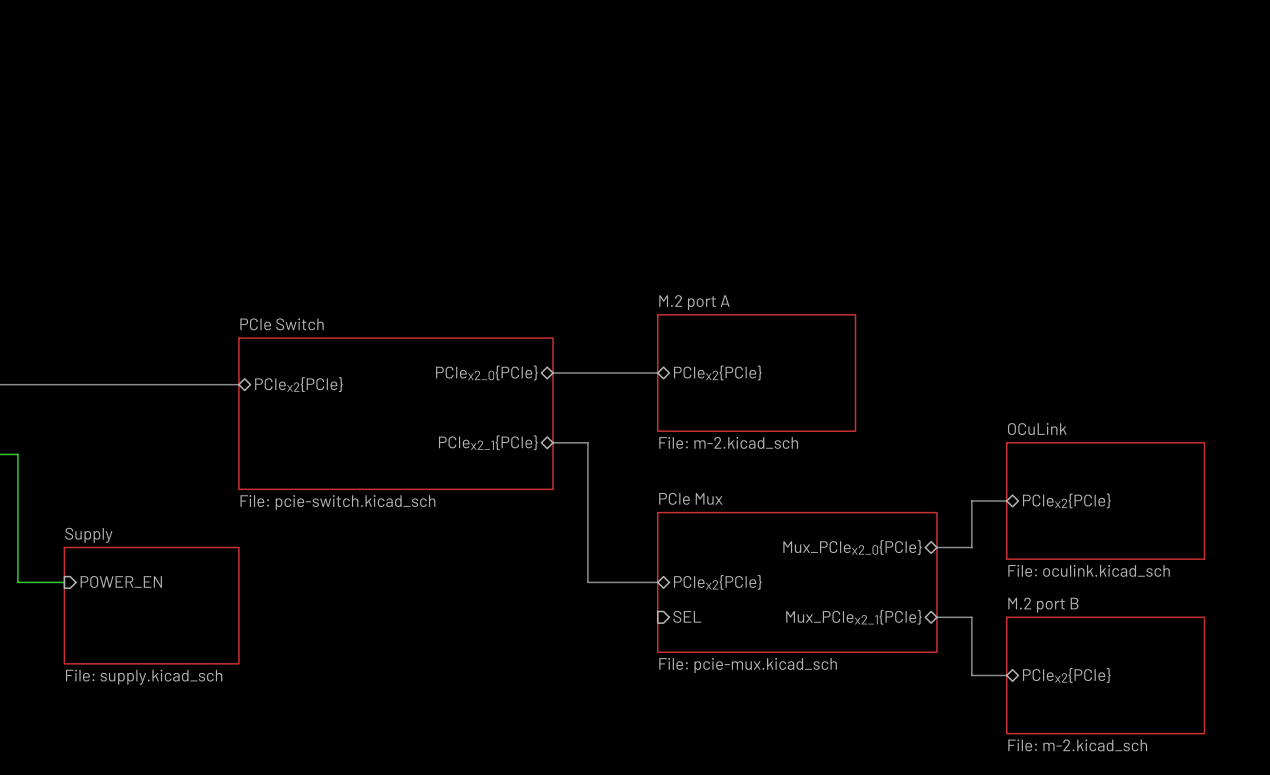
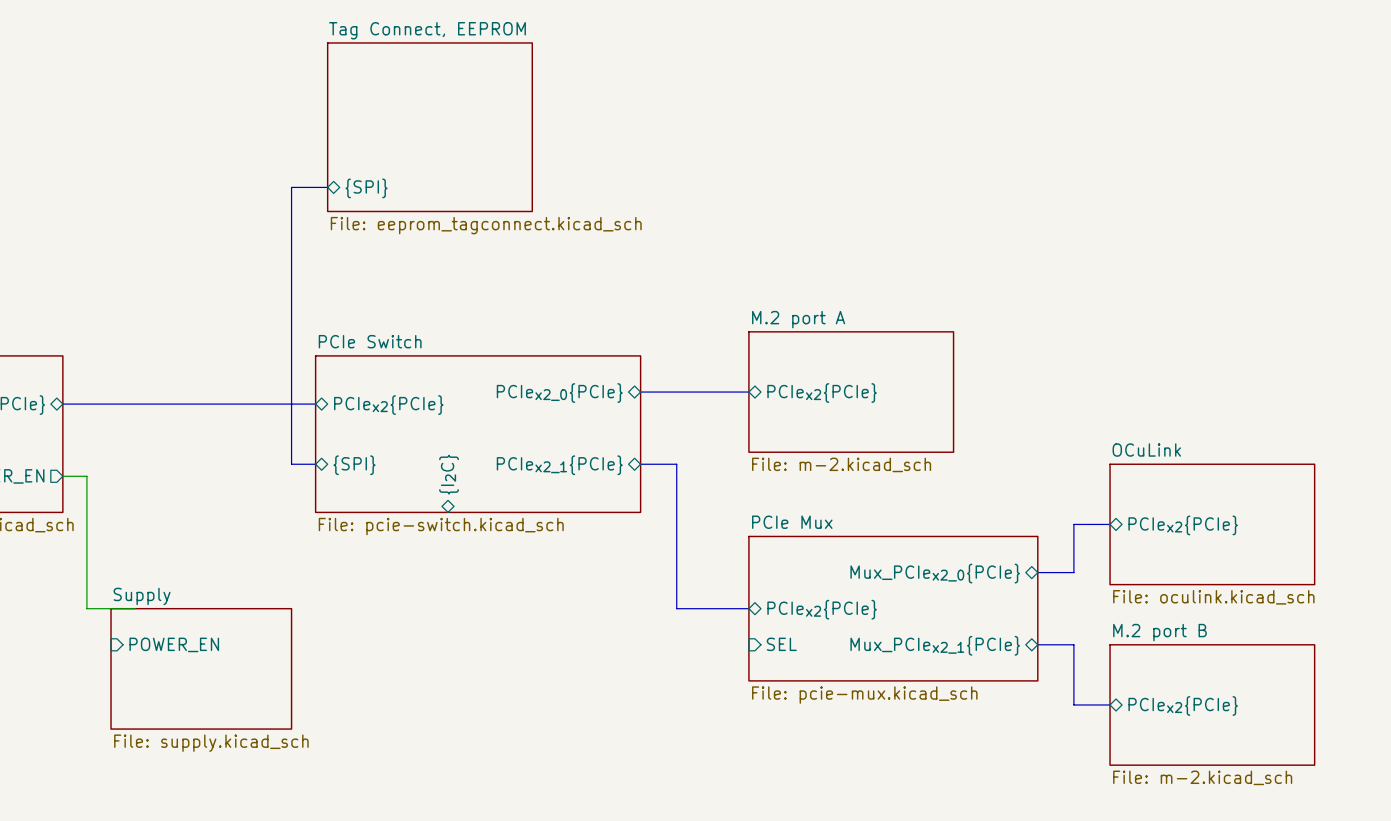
sheet Tag Connect, EEPROM: none -> File: eeprom_tagconnect.kicad_sch (429, 127)
bus: none -> (327, 187) (291, 187) (291, 464) (315, 464)
sheet pin: none -> {SPI} (366, 188)
sheet pin: none -> {SPI} (354, 465)
sheet pin: none -> {I2C} (449, 474)
sheet pin position: POWER_EN (121, 581) -> POWER_EN (174, 644)
sheet Supply position: (151, 605) -> (201, 668)

